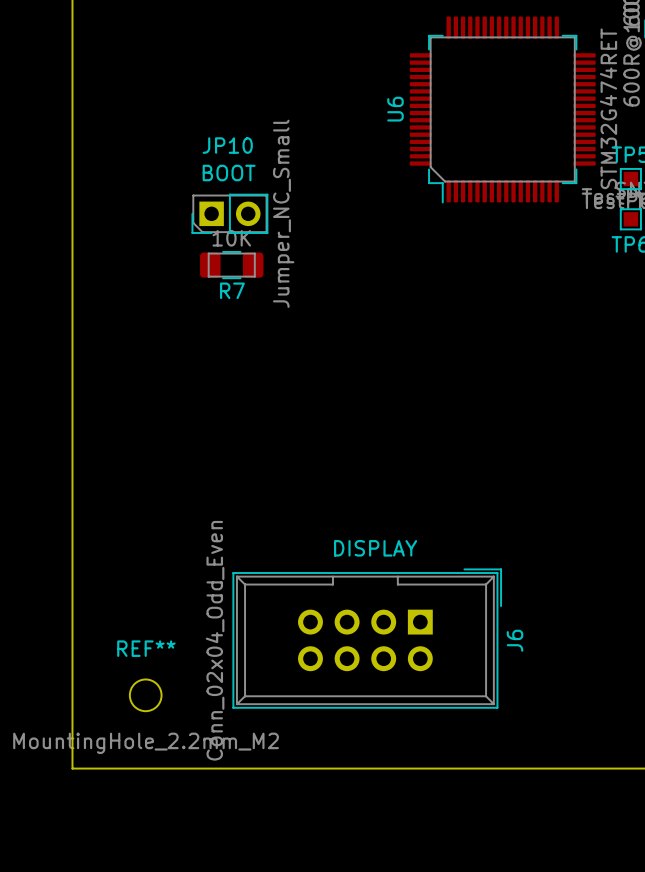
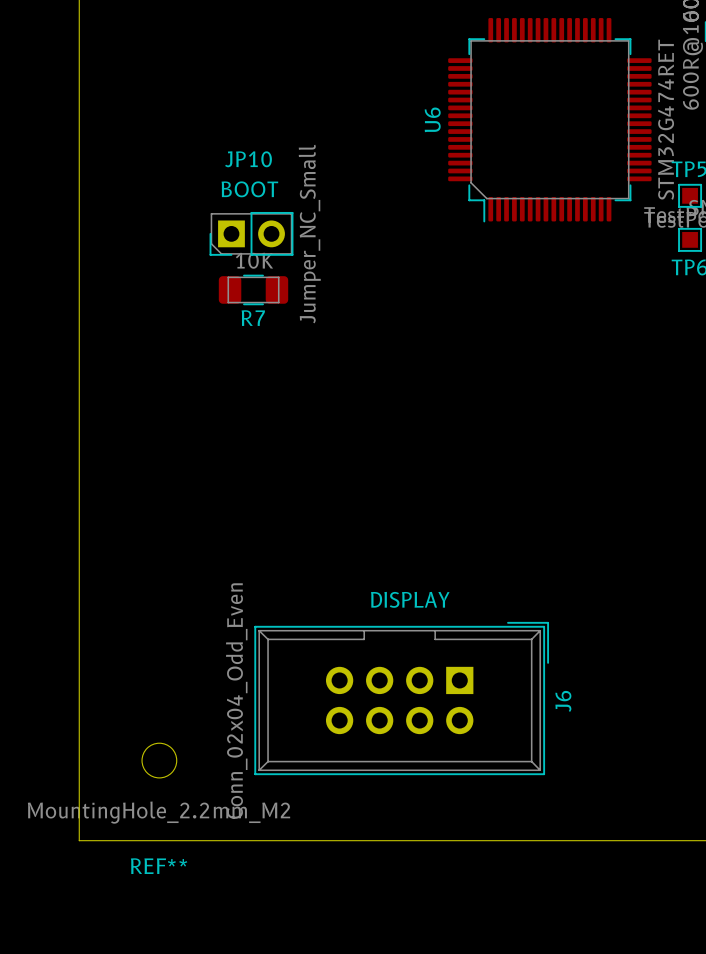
REF** name position: REF** (146, 648) -> REF** (159, 866)

